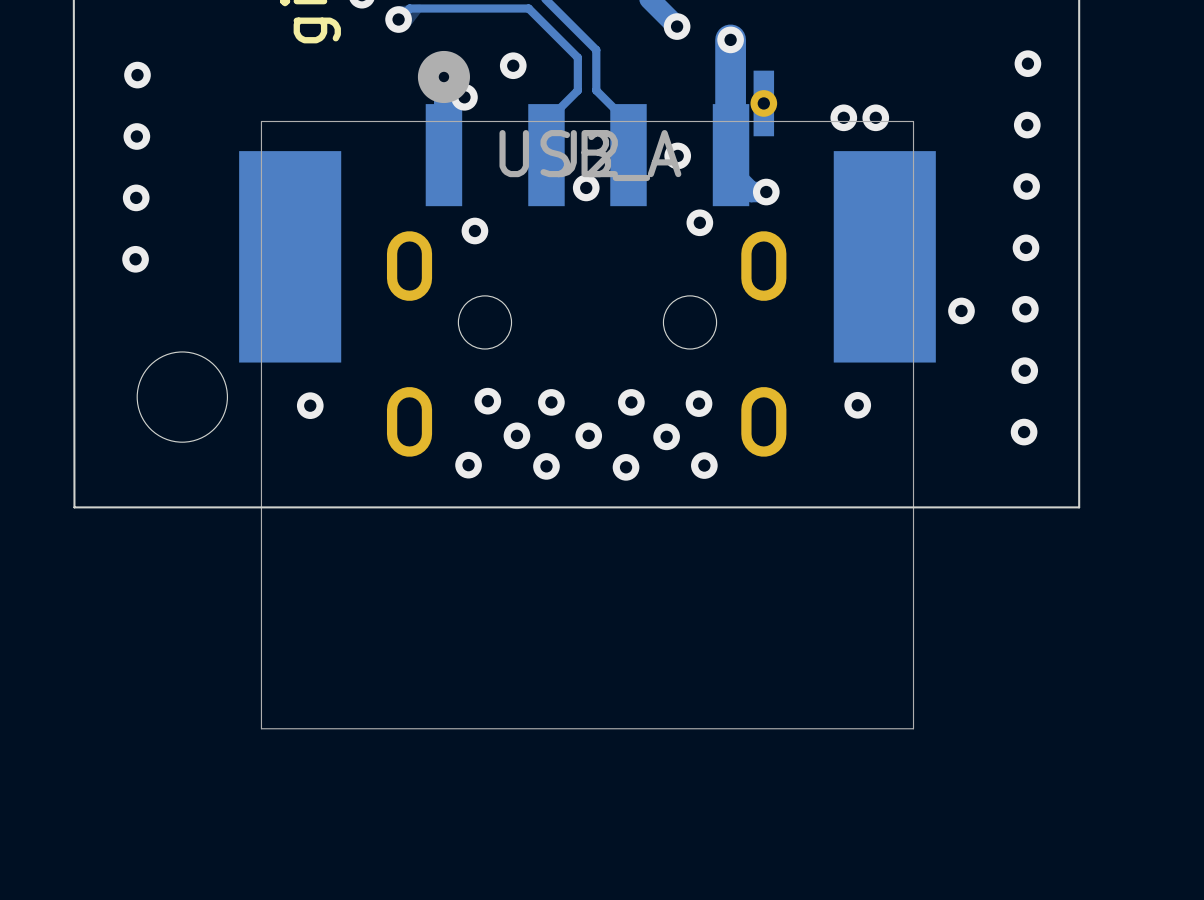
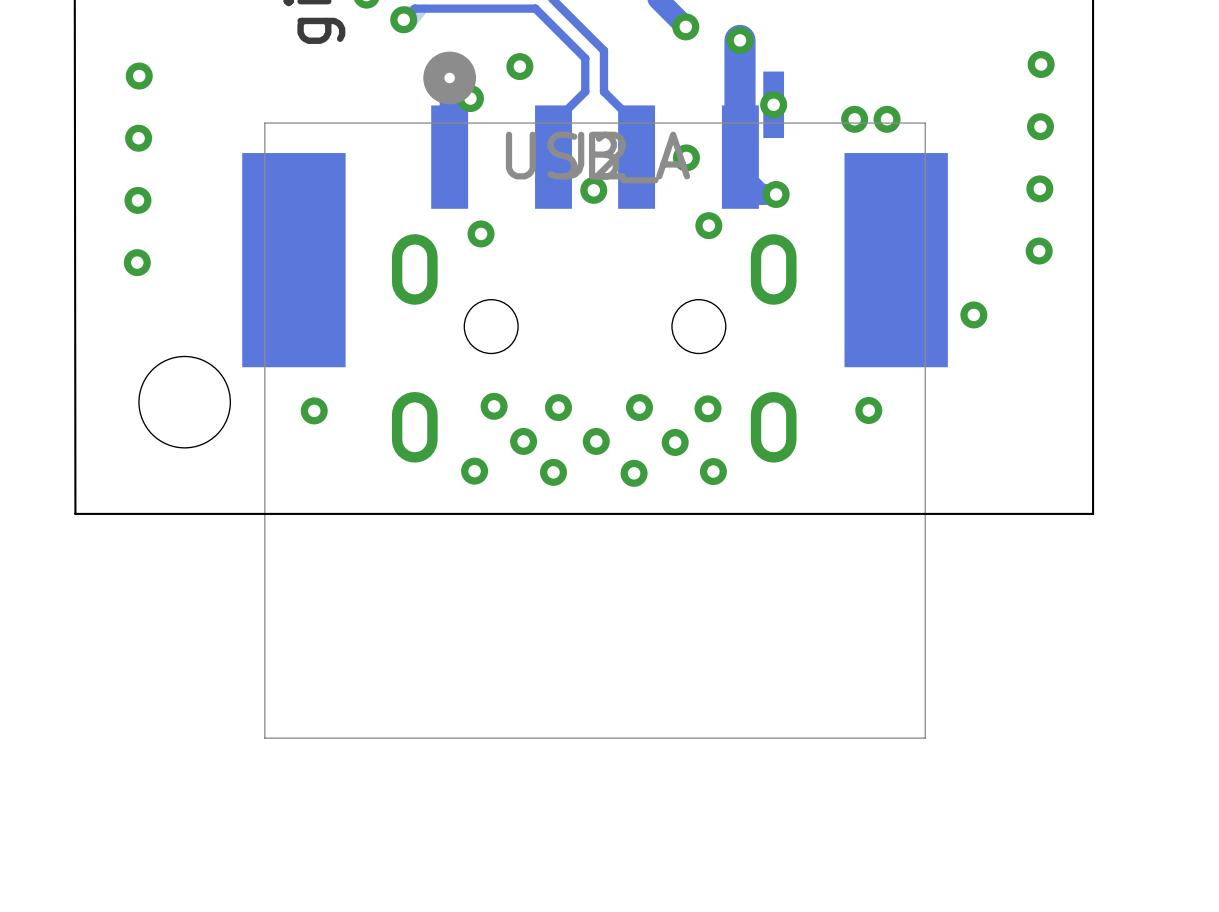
via: (1025, 309) -> none
via: (1024, 370) -> none
via: (1024, 432) -> none

